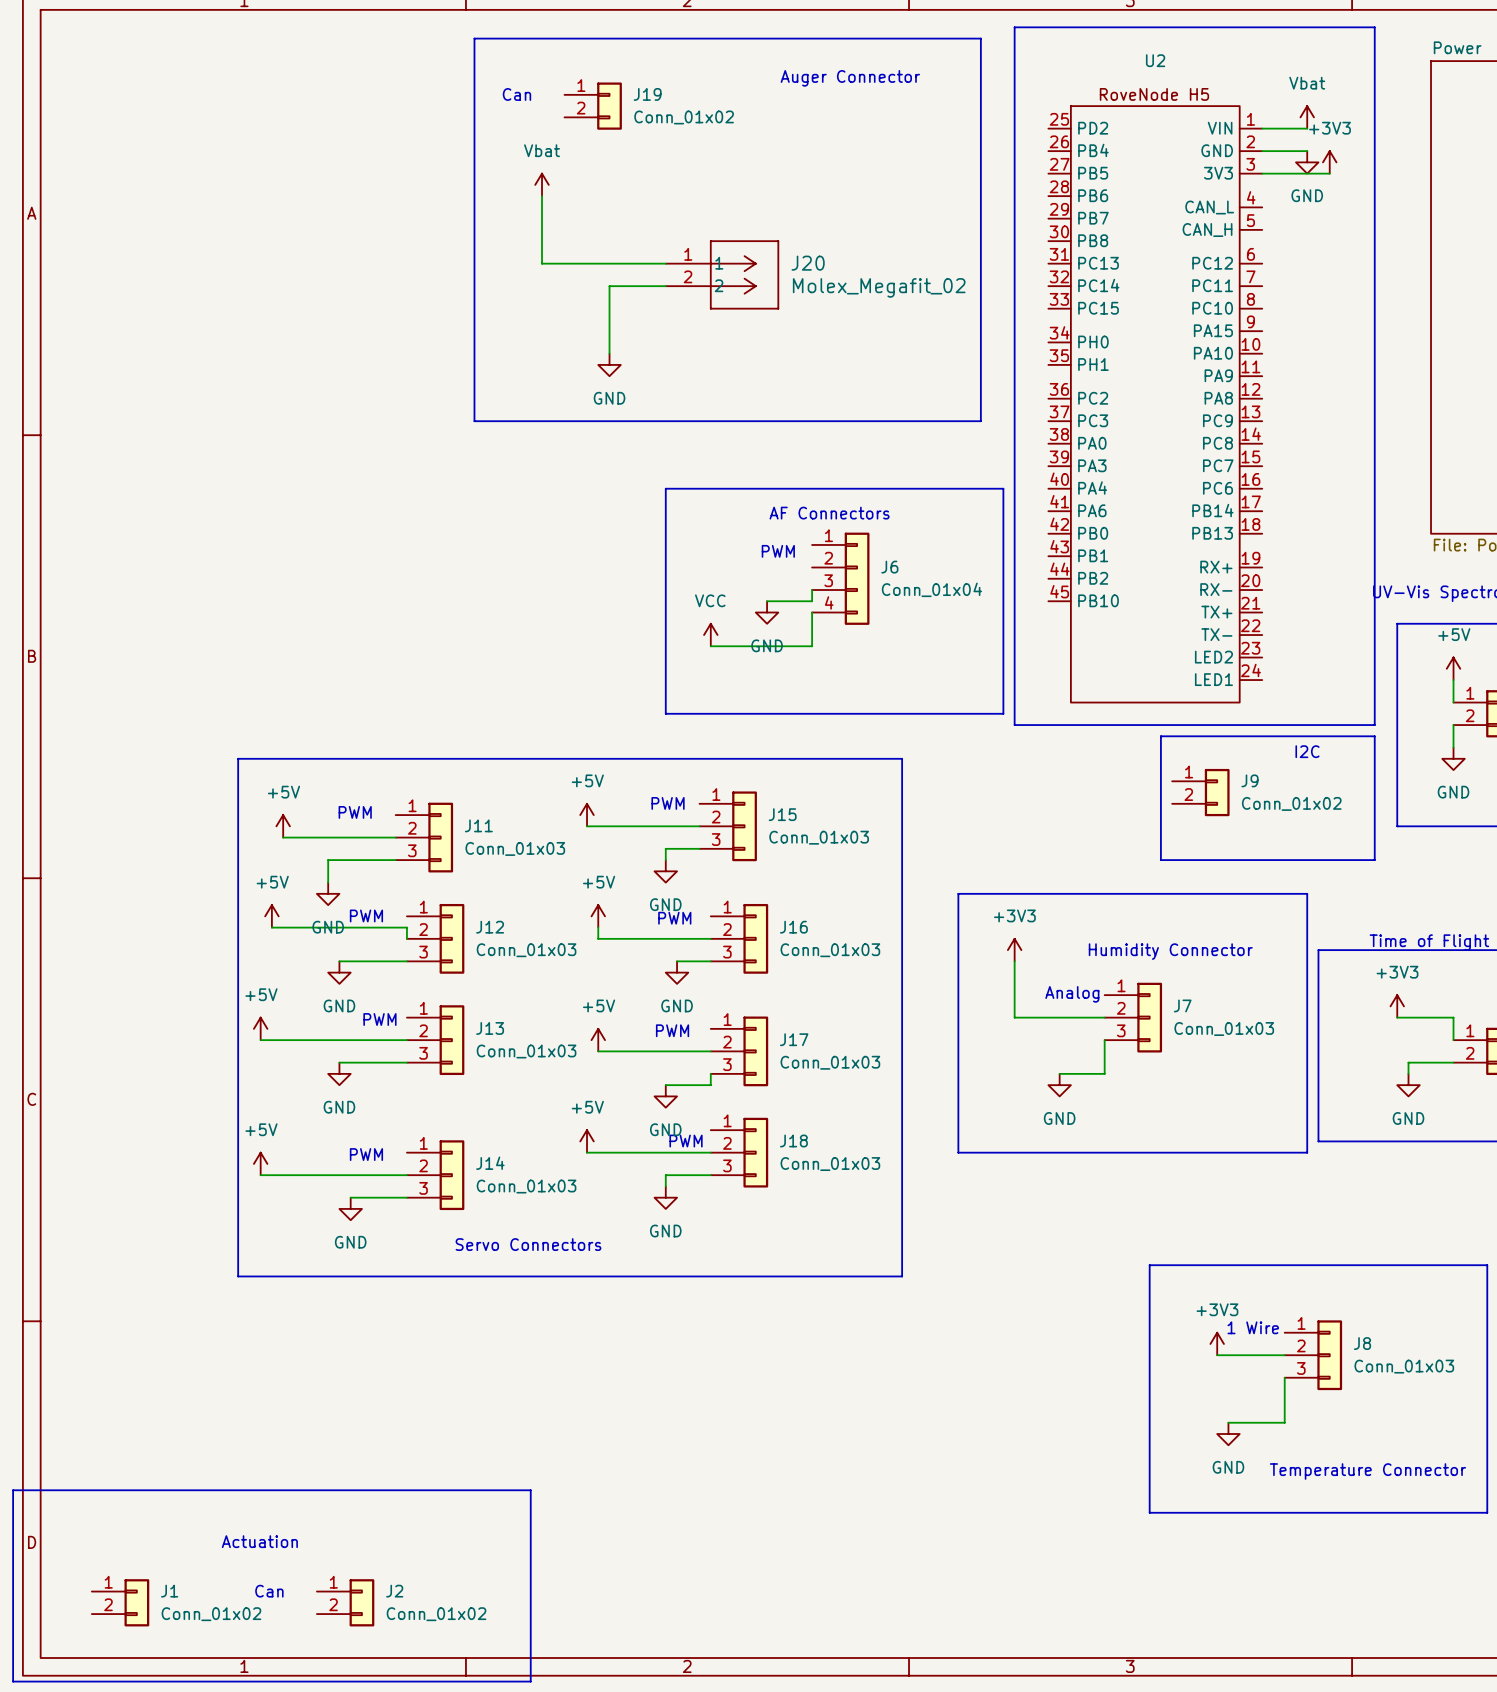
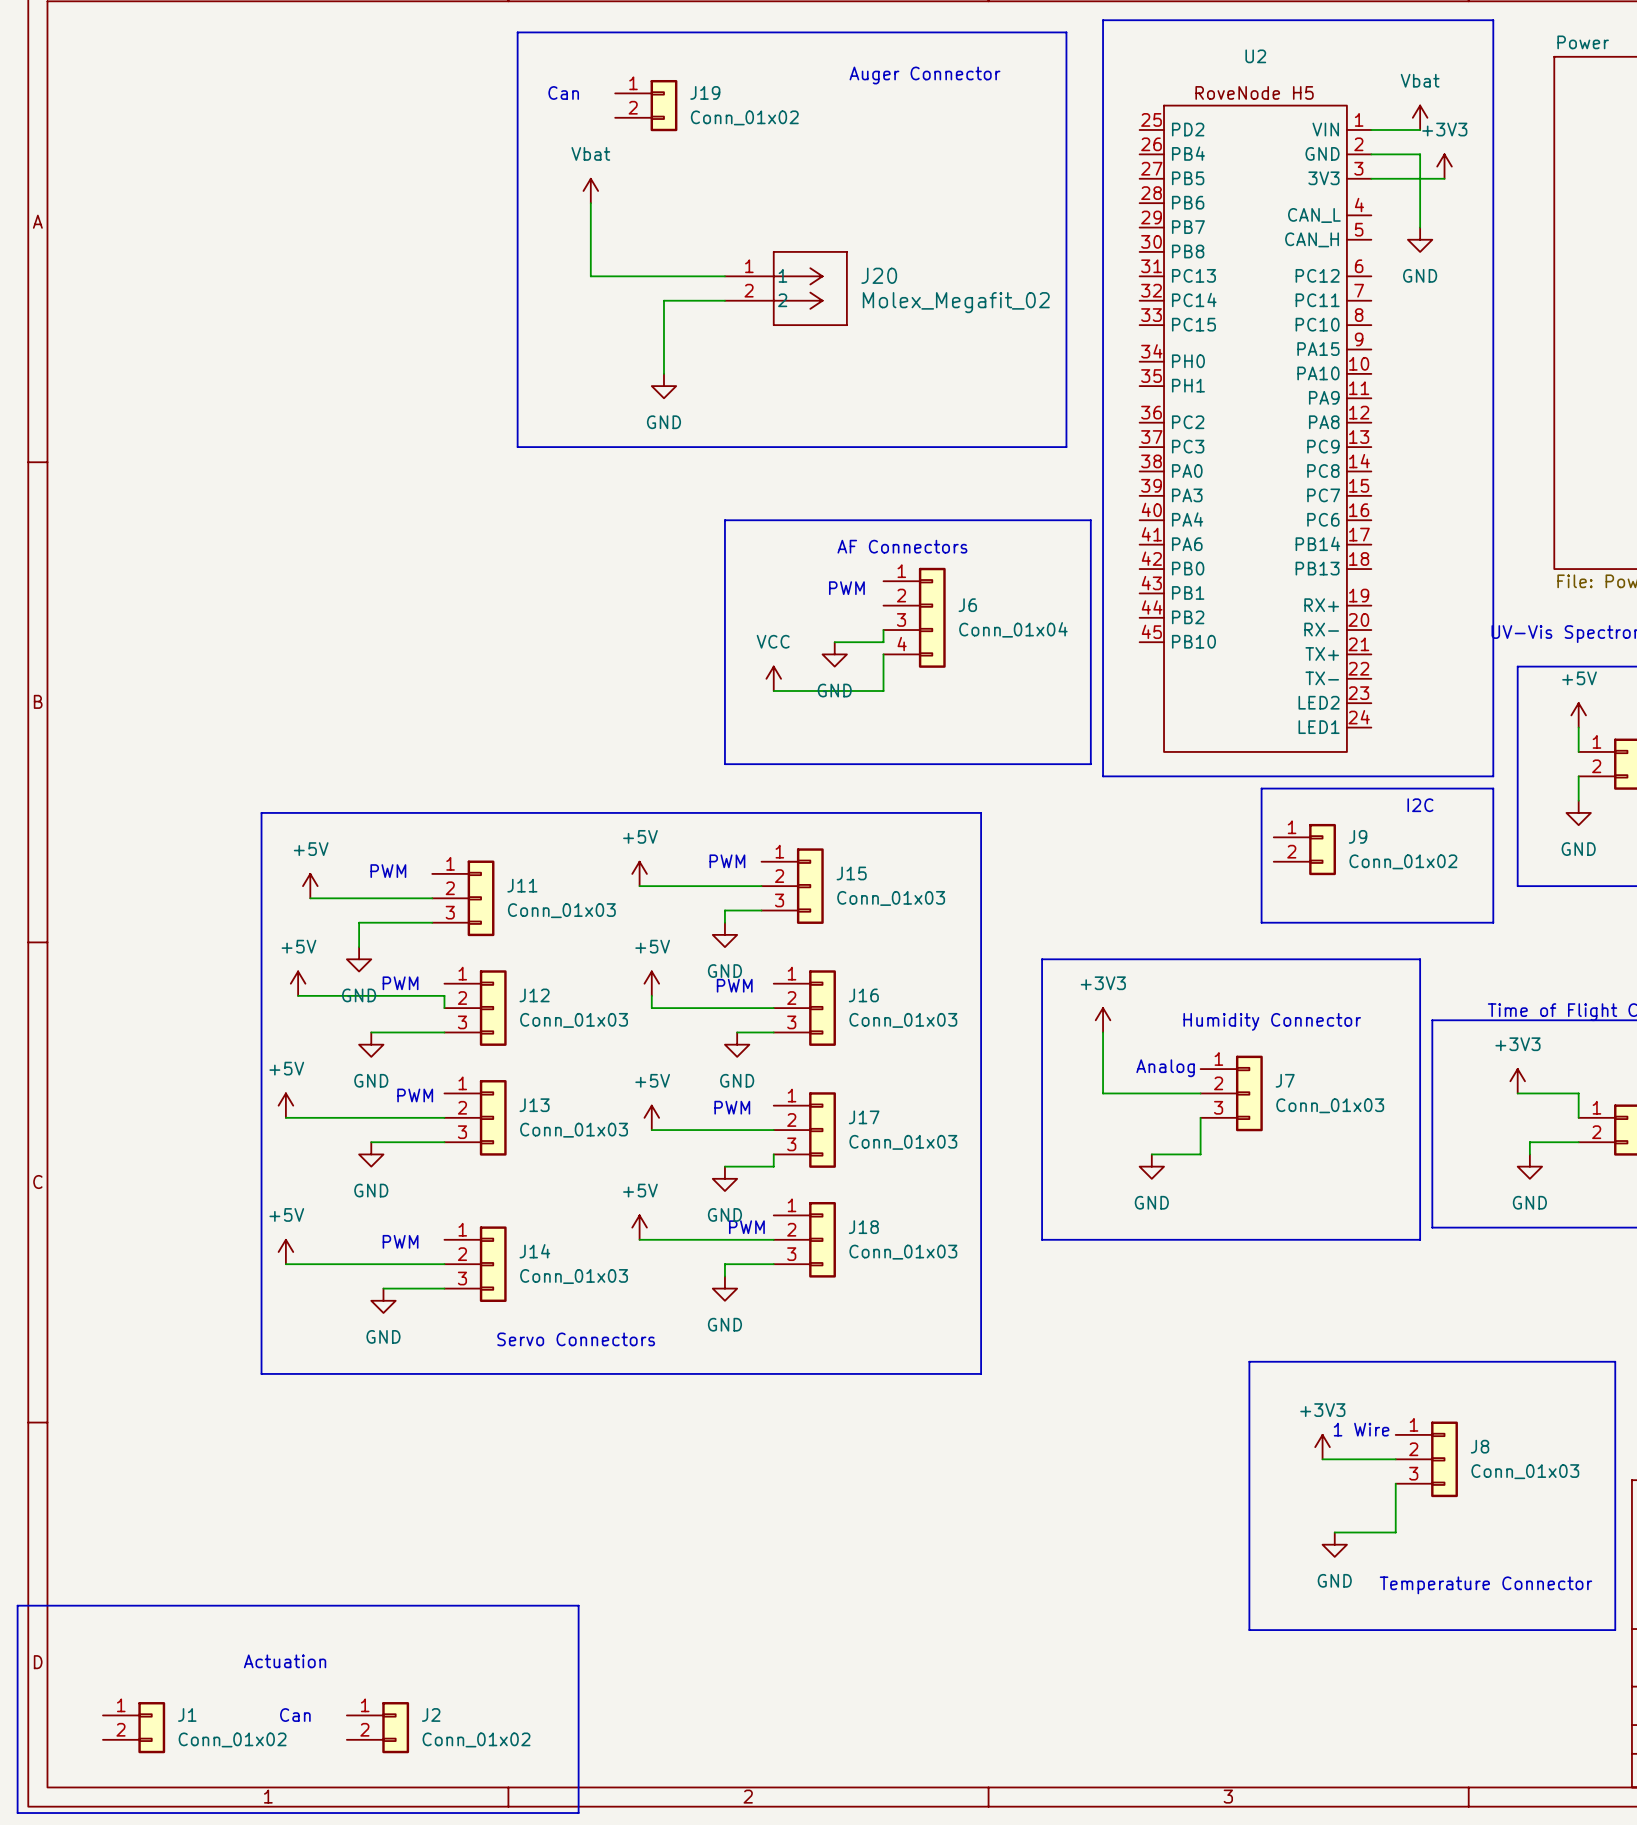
wire: none -> (1420, 154) (1420, 227)
power symbol position: GND (1307, 162) -> GND (1420, 239)

